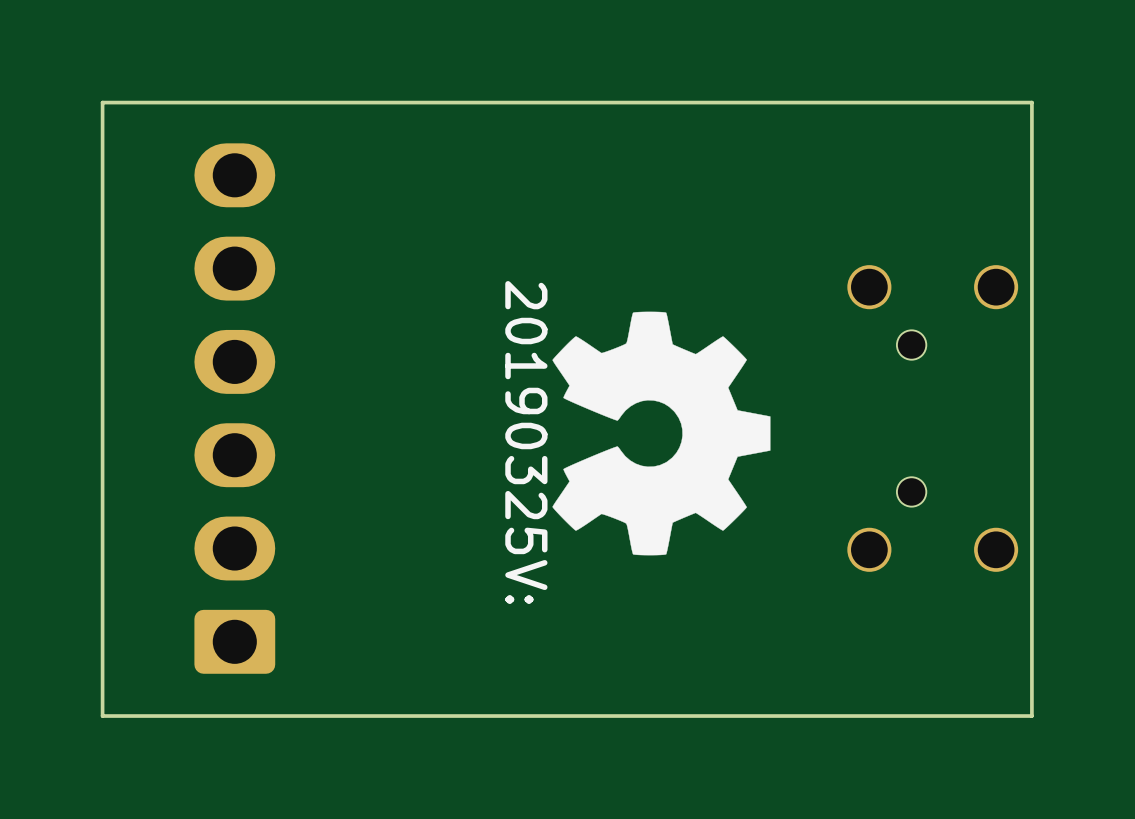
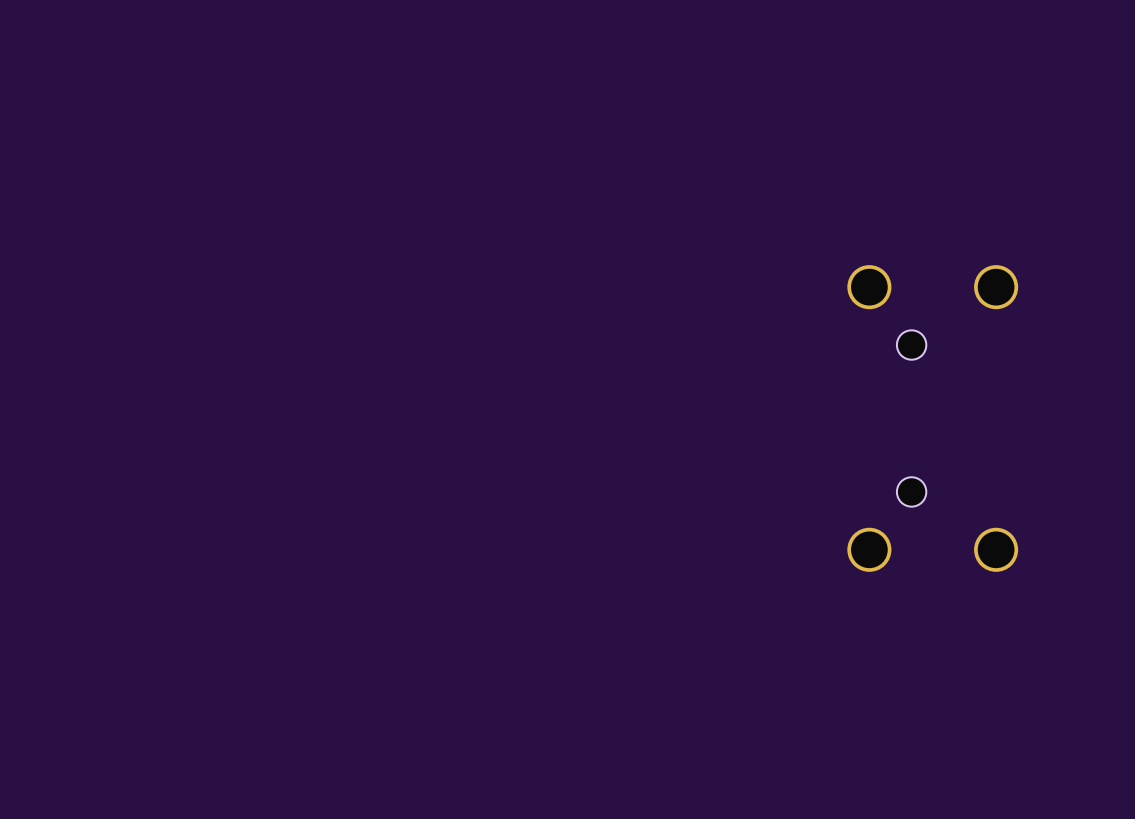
board edge: (1031, 102) (102, 102) (102, 716) (1031, 716) (1031, 102) -> none
drawing: [552, 311, 771, 556] -> none
part: (234, 408) -> none

